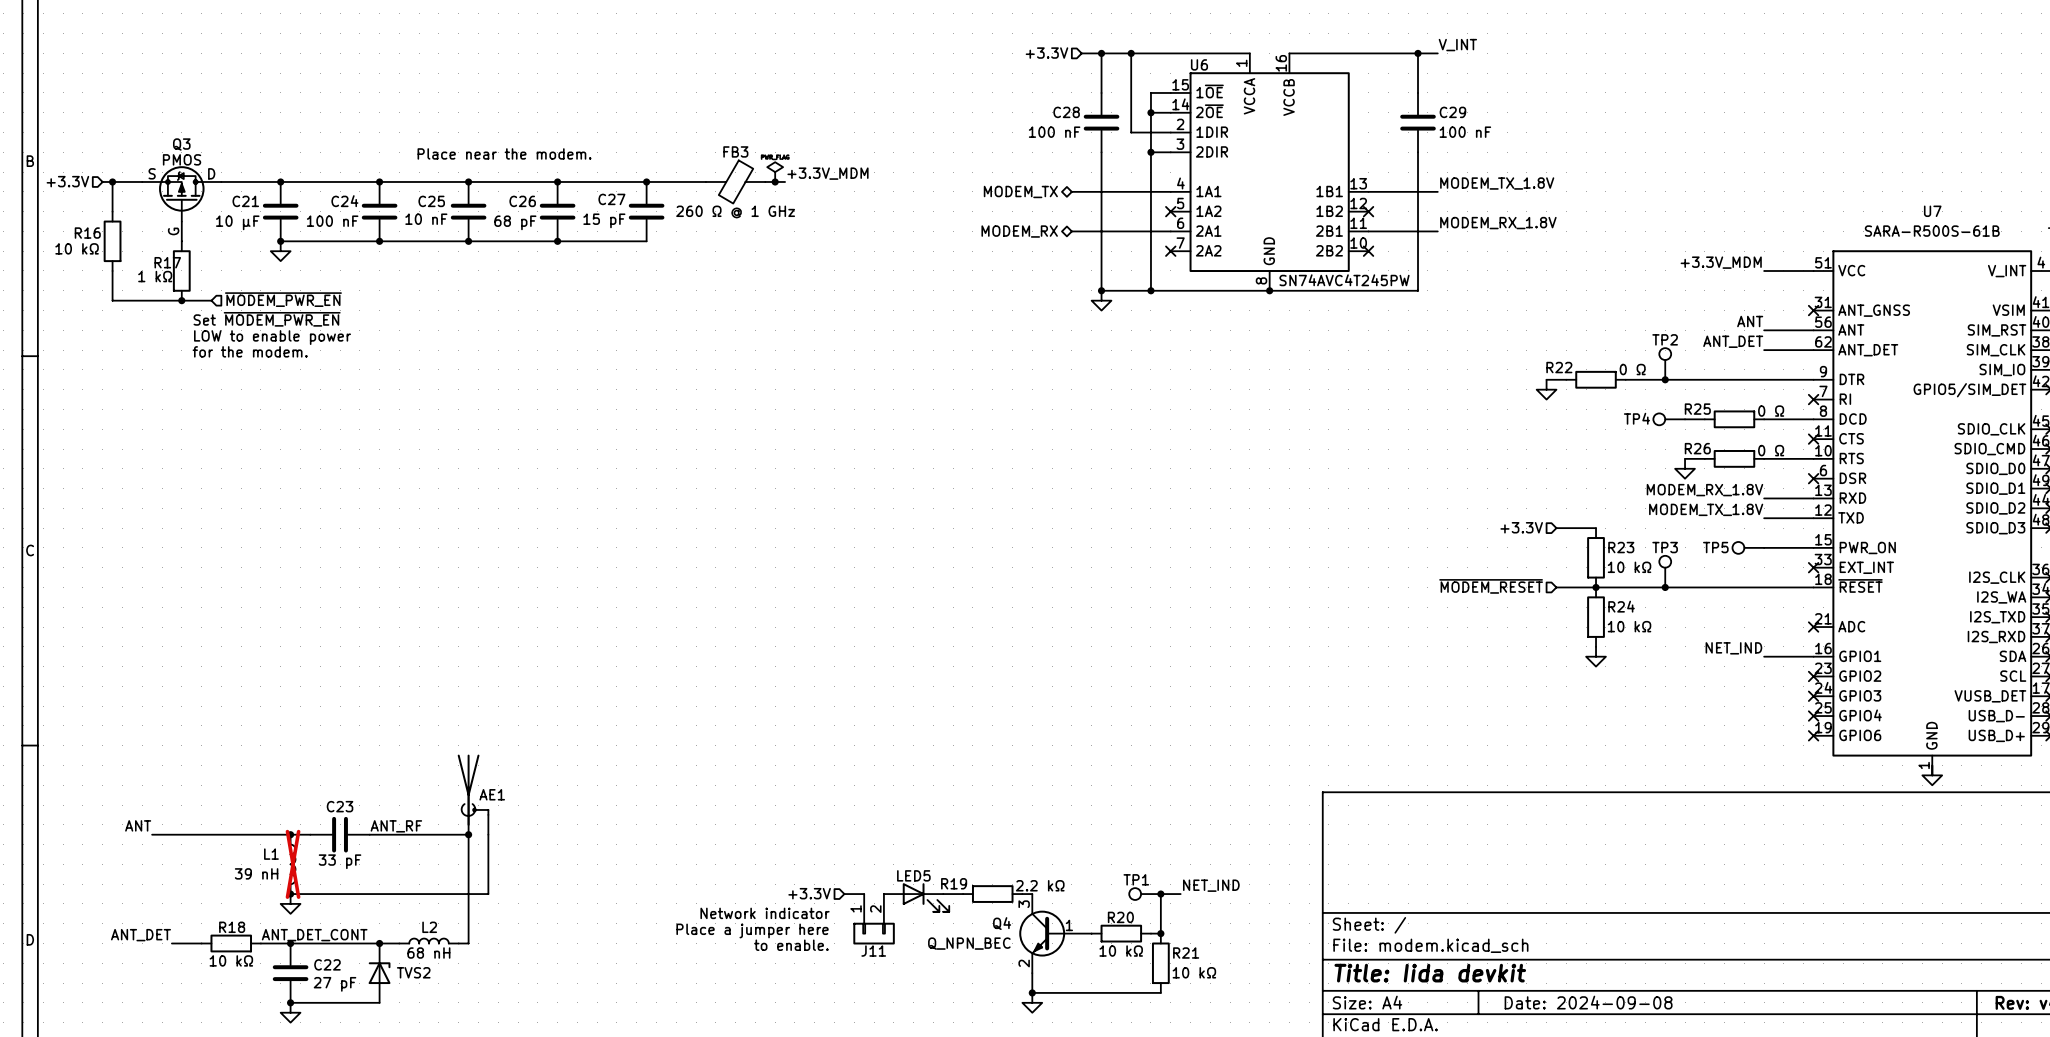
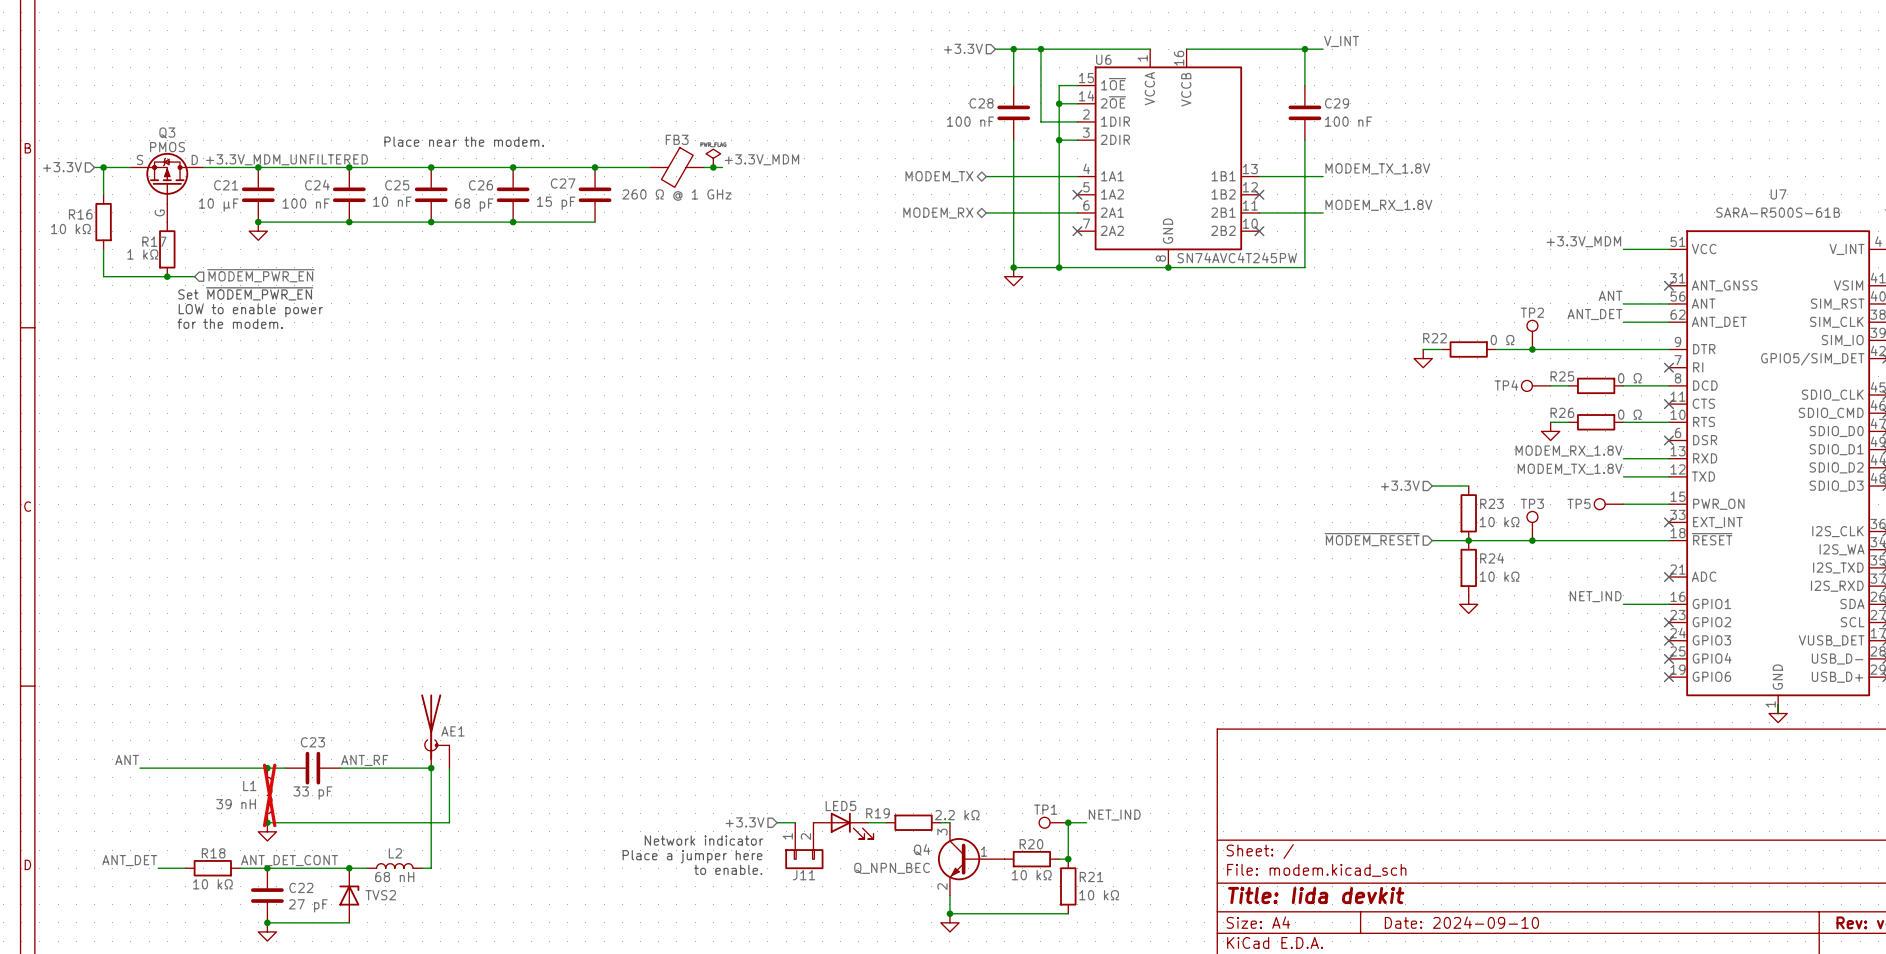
label: none -> +3.3V_MDM_UNFILTERED (286, 159)
title block: Date: 2024-09-08 (1588, 1002) -> Date: 2024-09-10 (1461, 922)

